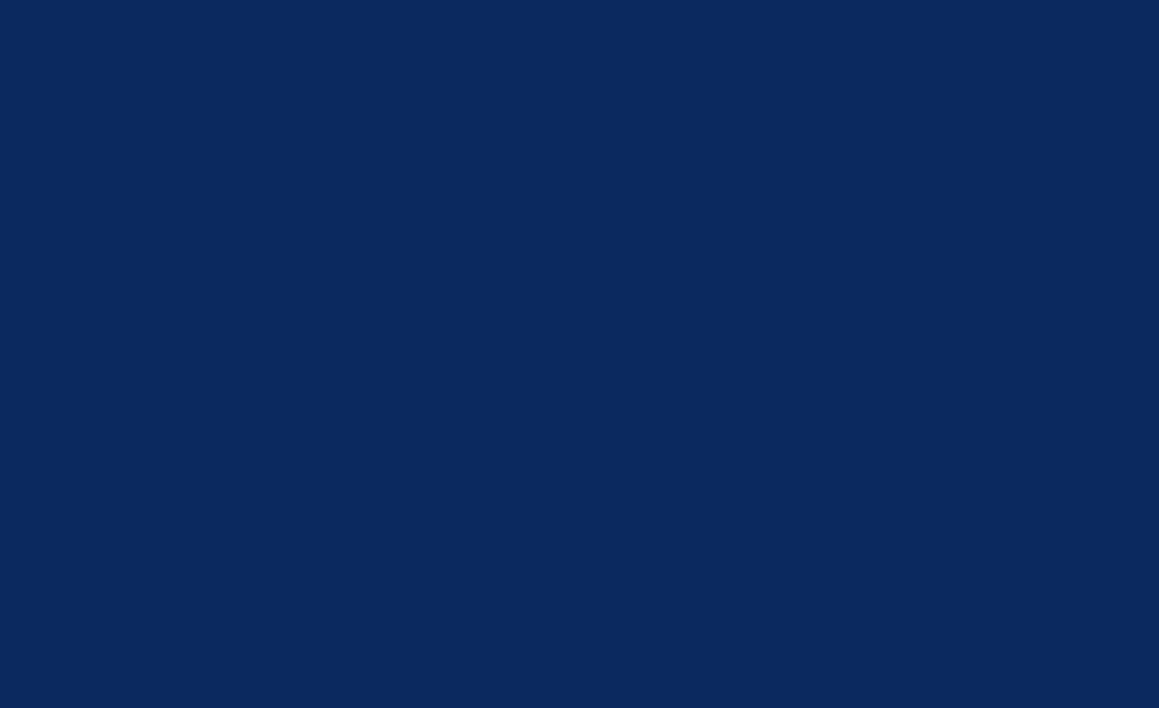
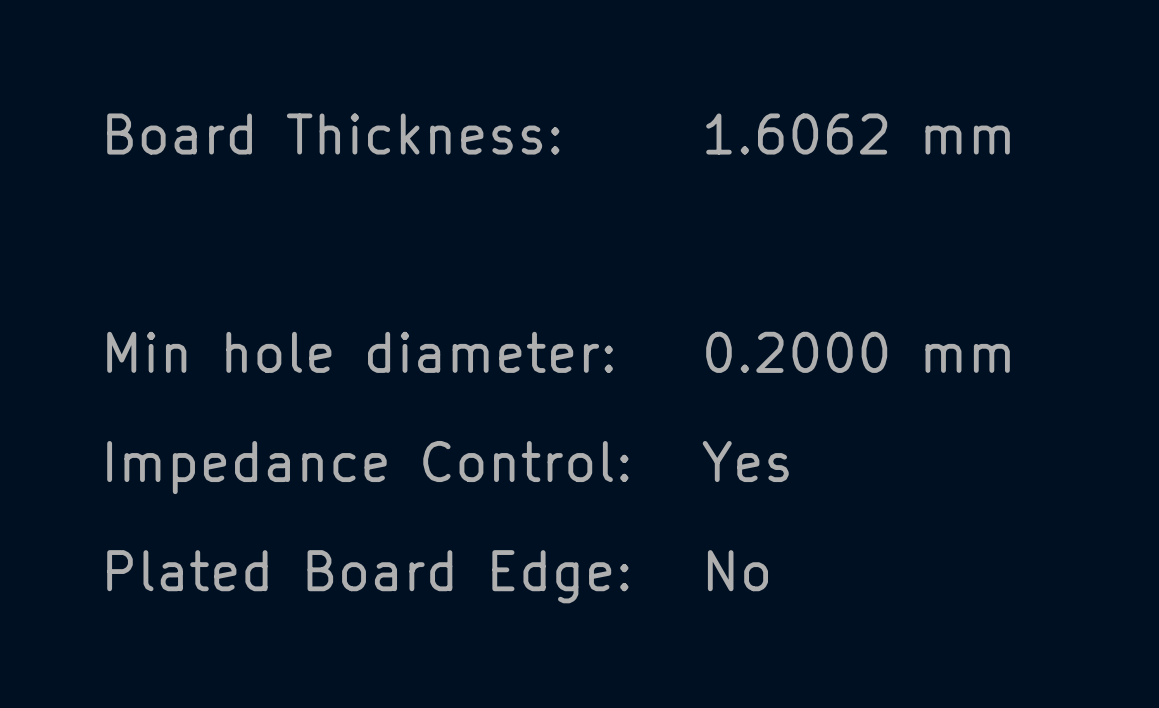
text: none -> Board Thickness: (333, 134)
text: none -> 1.6062 mm (857, 134)
text: none -> Min hole diameter: (360, 352)
text: none -> 0.2000 mm (857, 352)
text: none -> Yes (745, 461)
text: none -> Impedance Control: (367, 467)
text: none -> No (737, 570)
text: none -> Plated Board Edge: (367, 576)

